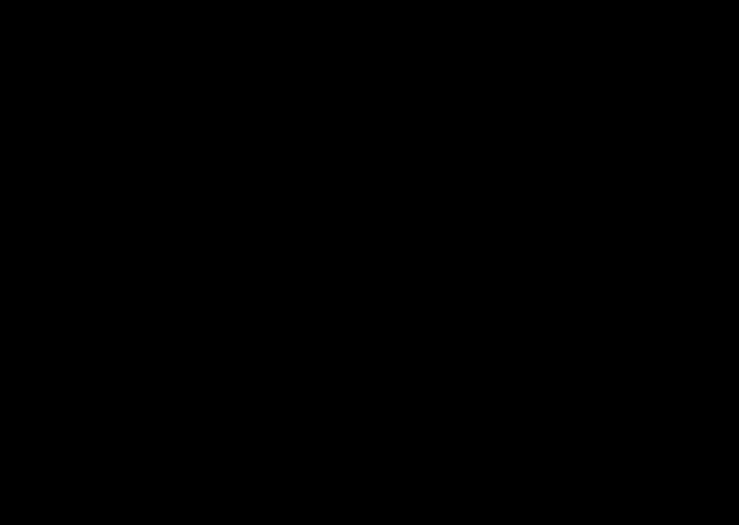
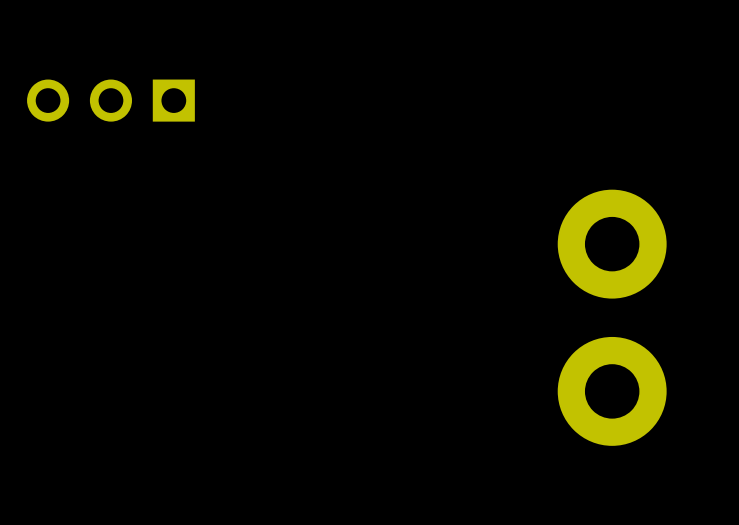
part: none -> (110, 100)
part: none -> (612, 244)
part: none -> (612, 391)

